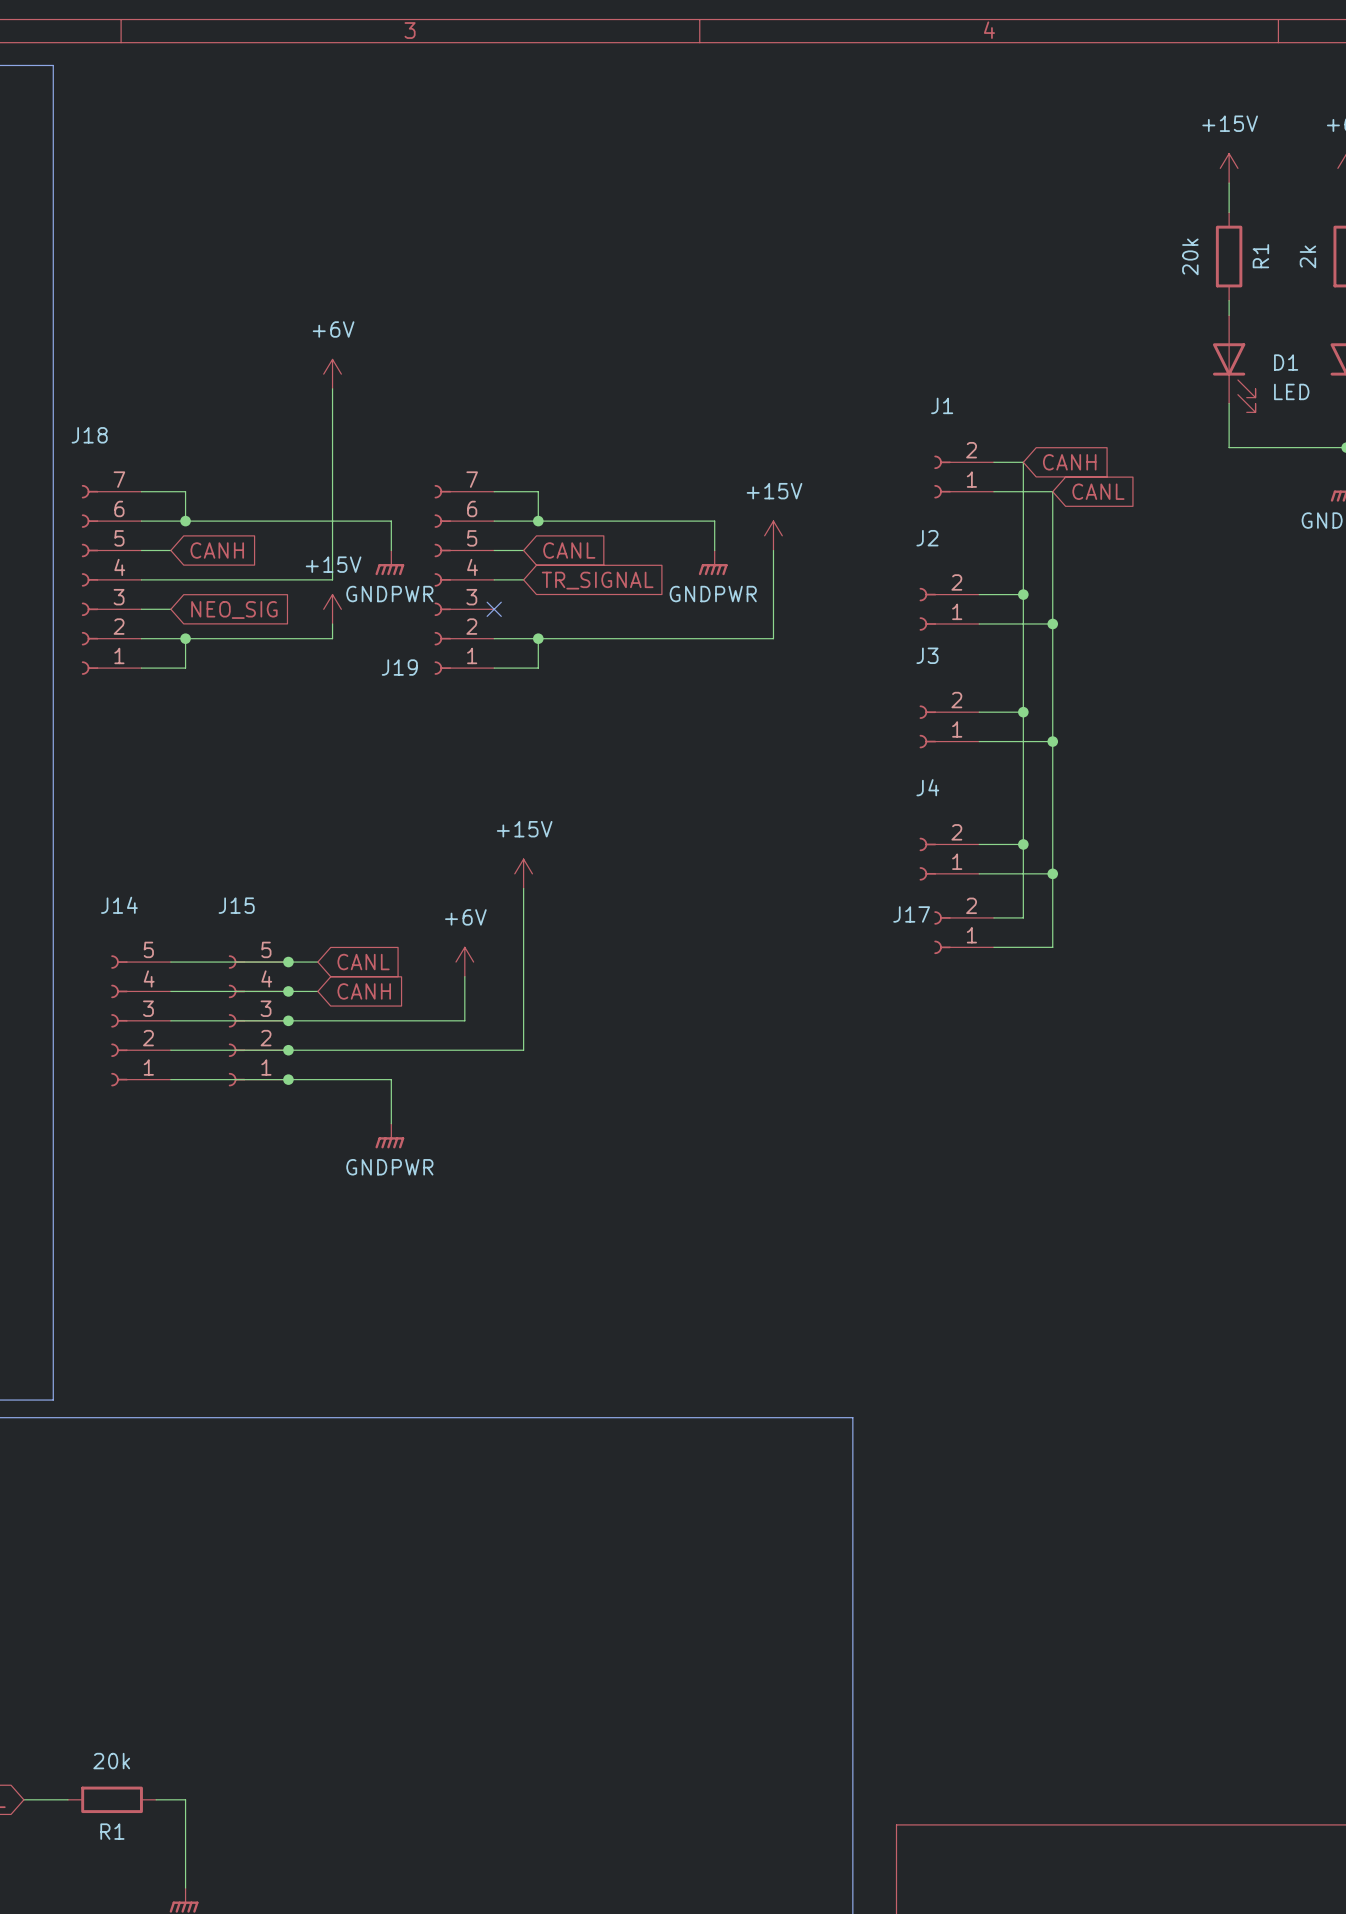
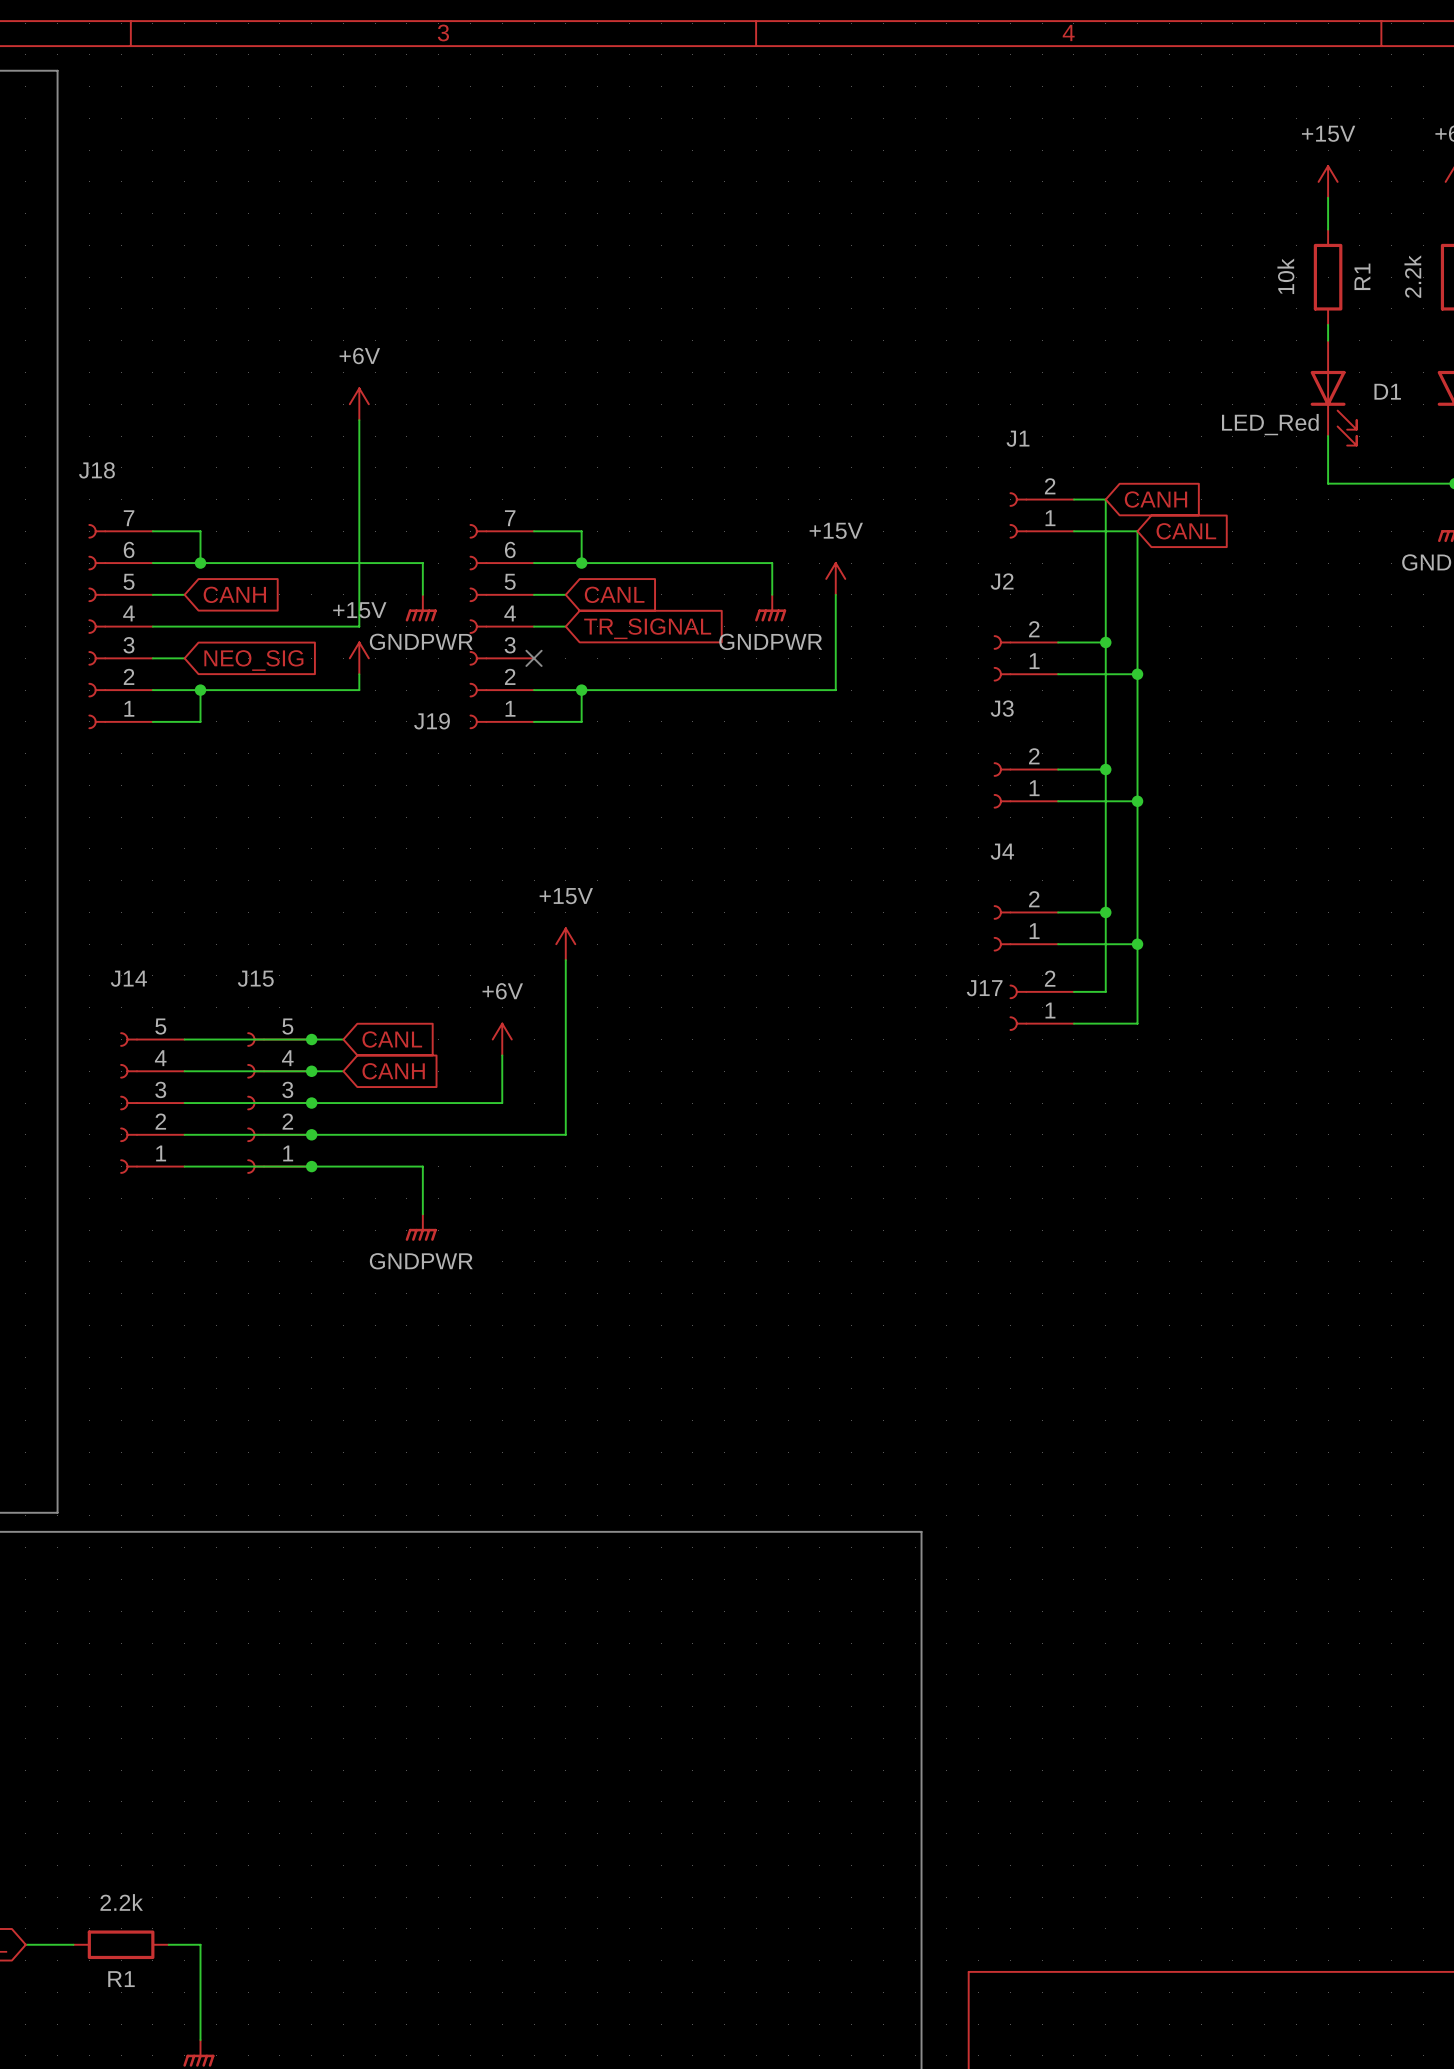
R1 value: 20k (1190, 256) -> 10k (1285, 276)
part value: 2k (1307, 256) -> 2.2k (1412, 276)
D1 value: LED (1291, 391) -> LED_Red (1270, 424)
R1 value: 20k (111, 1761) -> 2.2k (121, 1902)

